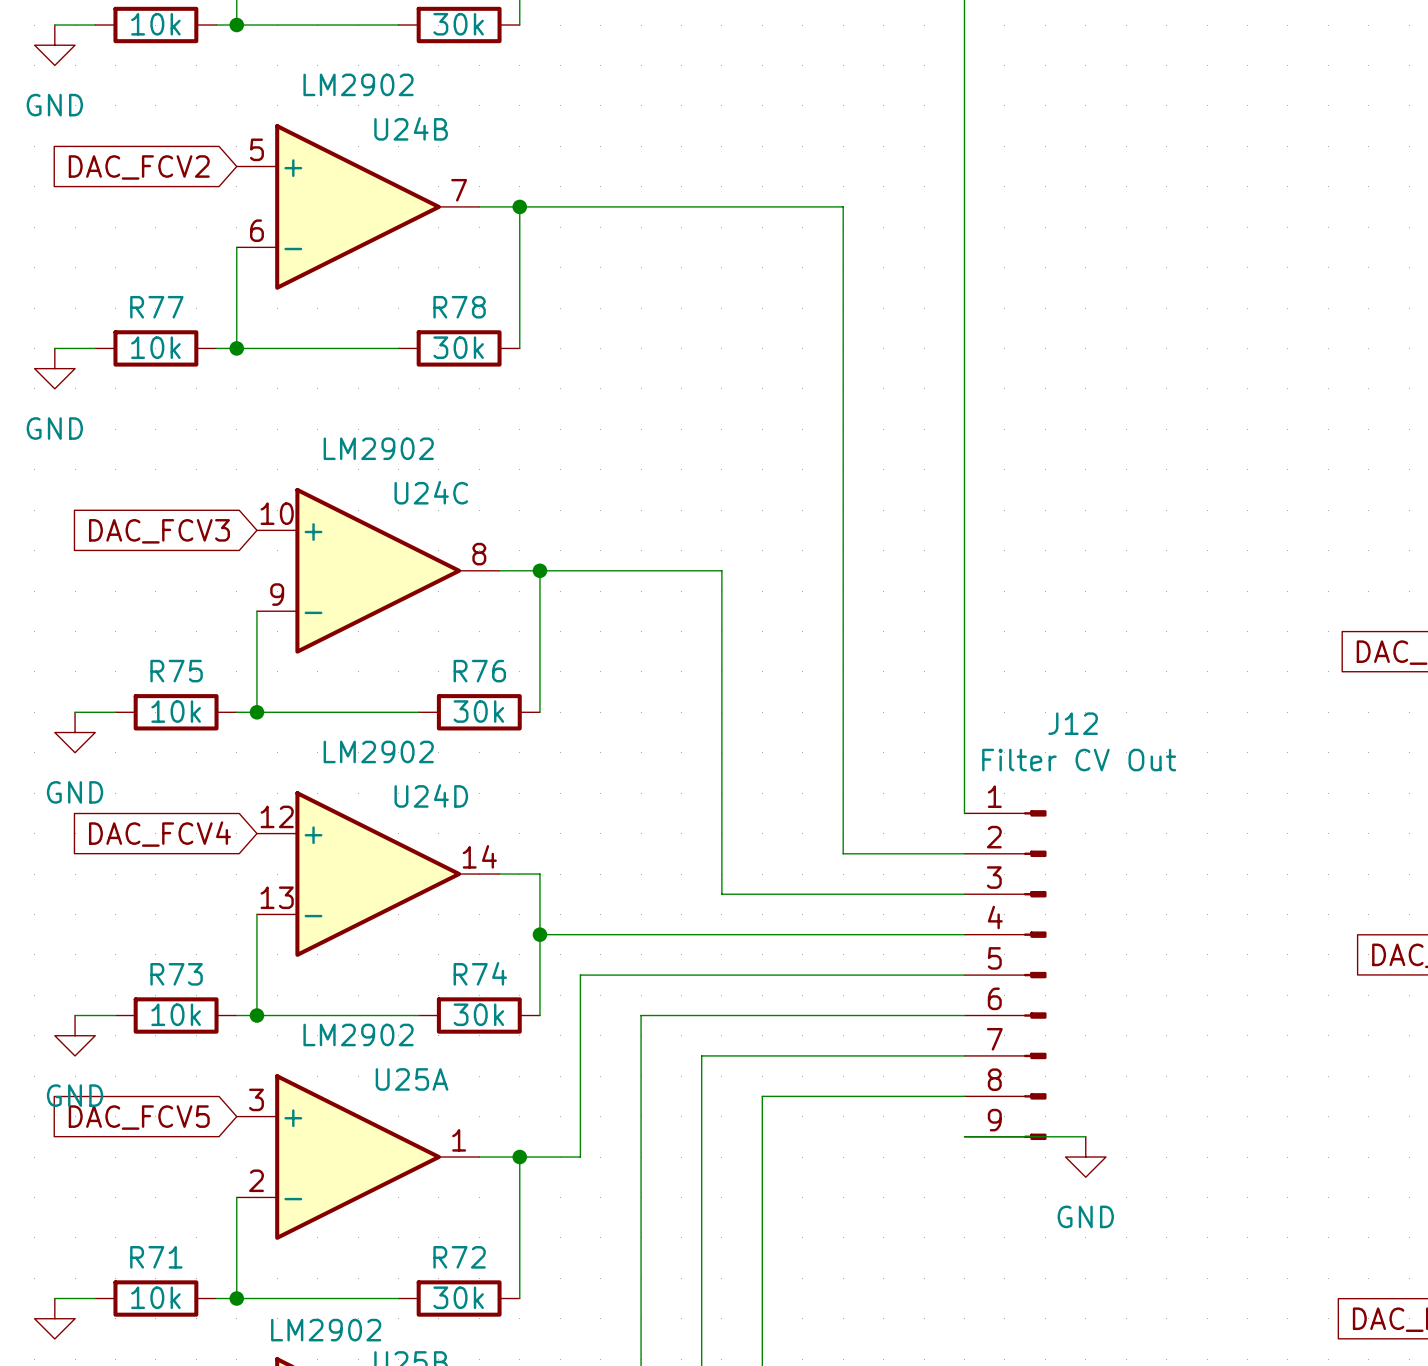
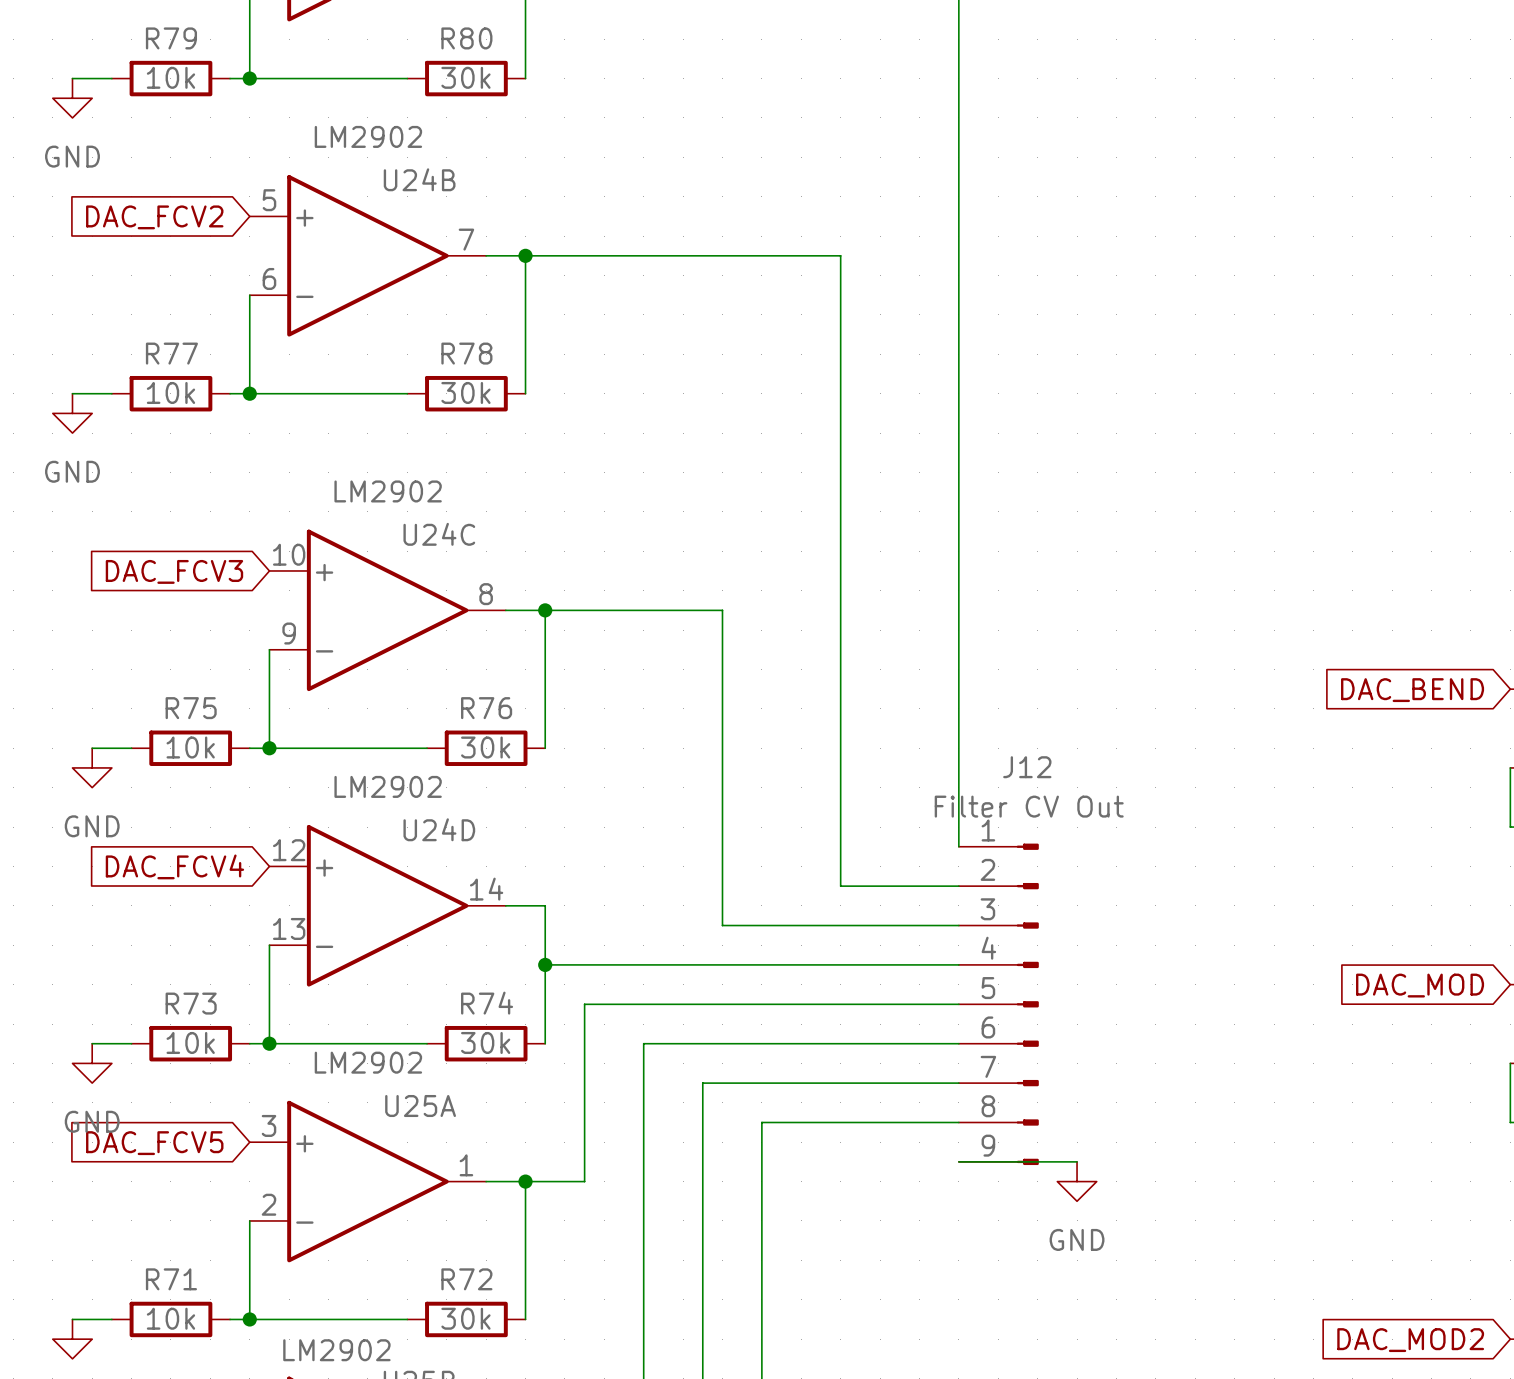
J12 name position: J12 (1073, 723) -> J12 (1027, 767)
J12 value position: Filter CV Out (1079, 760) -> Filter CV Out (1029, 806)

